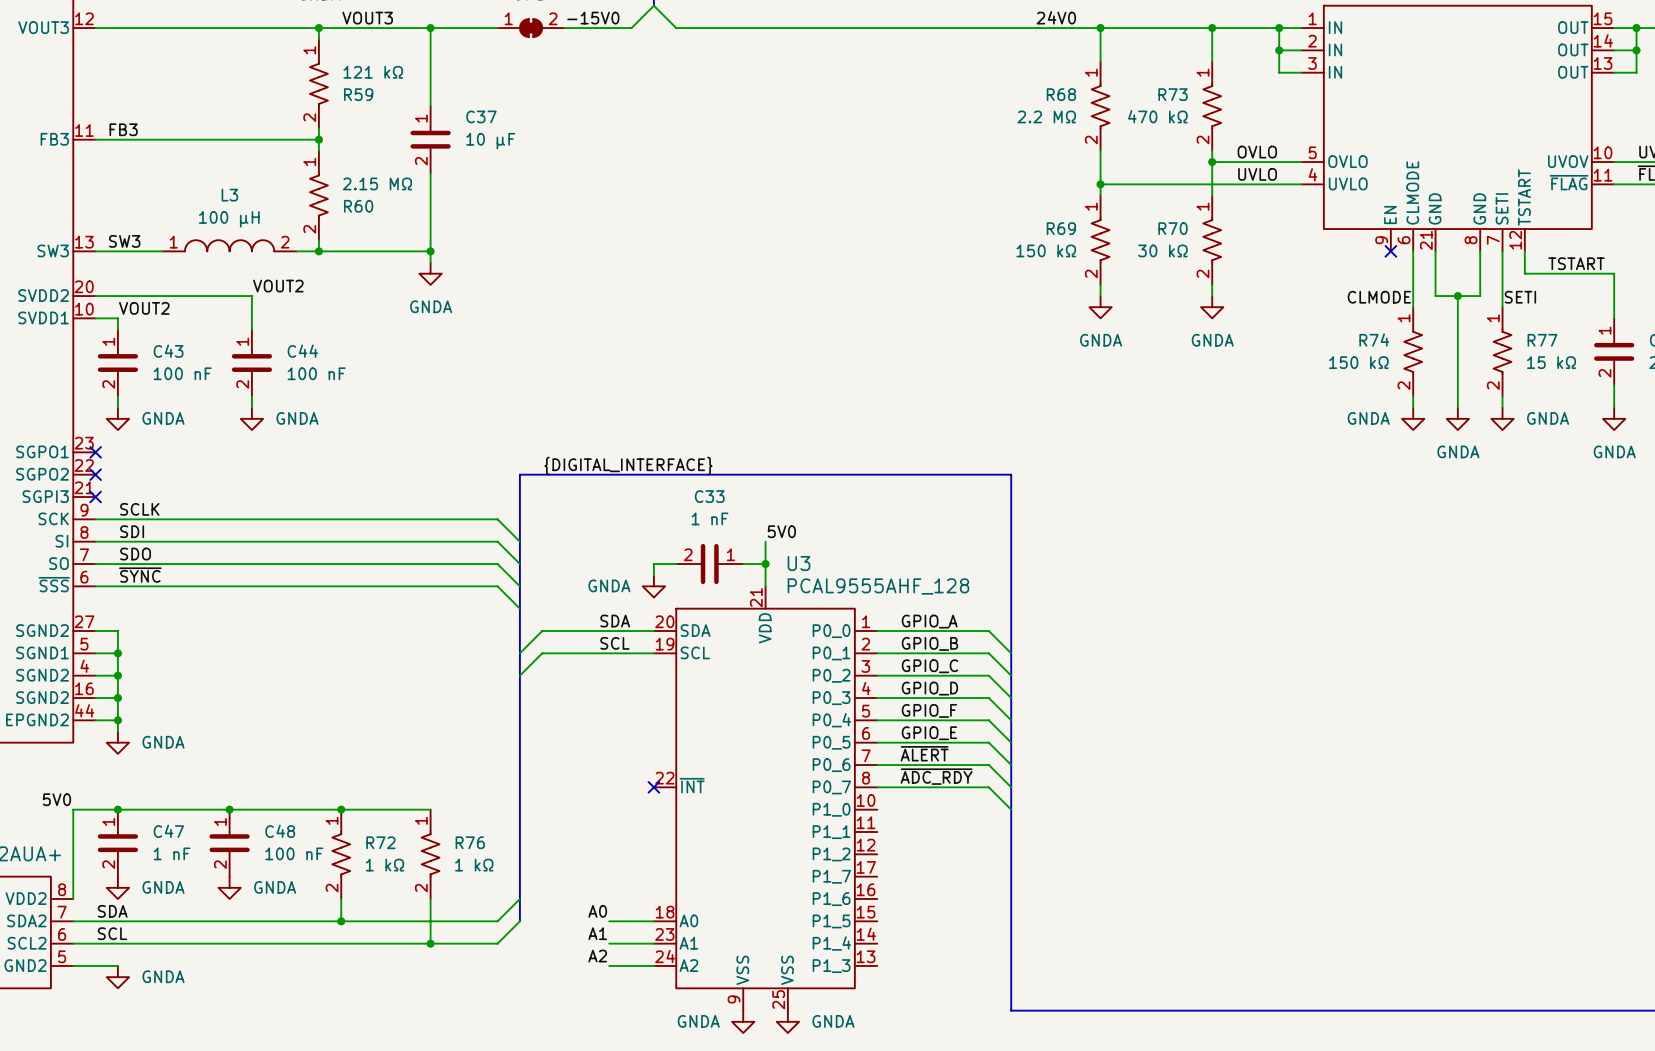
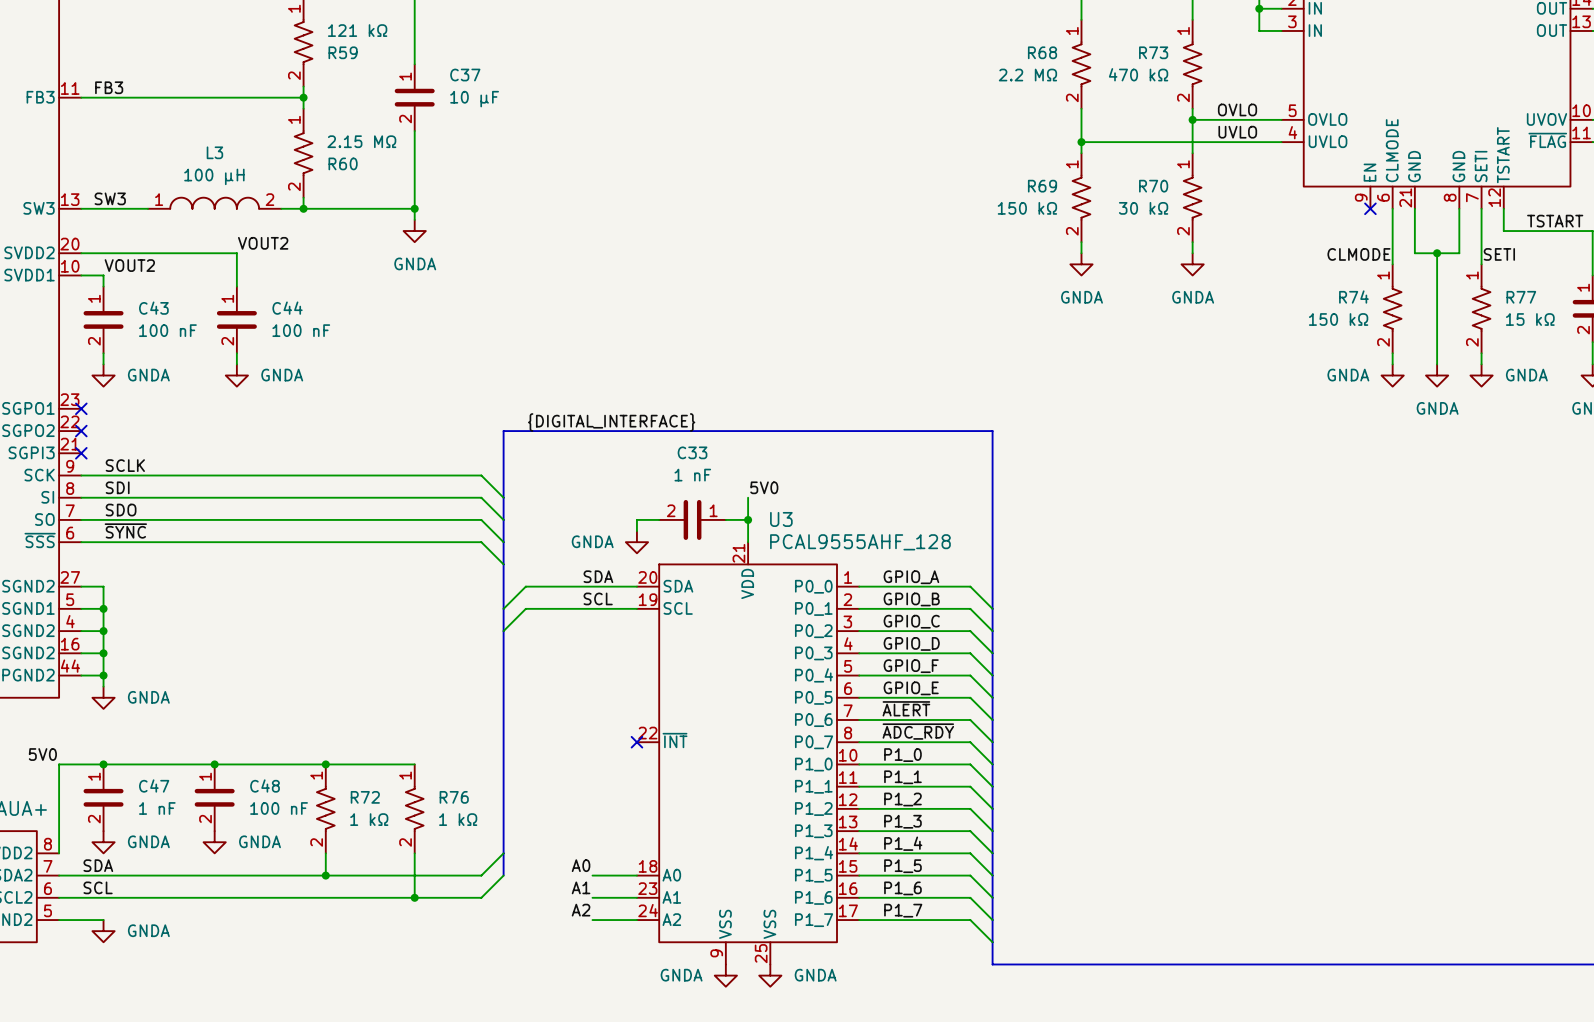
label: none -> P1_0 (902, 755)
wire: none -> (859, 764) (970, 764) (992, 786)
label: none -> P1_1 (902, 777)
wire: none -> (859, 786) (970, 786) (992, 808)
label: none -> P1_2 (902, 799)
wire: none -> (859, 808) (970, 808) (992, 831)
U3 pin number: 17 (866, 867) -> 13 (848, 821)
label: none -> P1_3 (902, 821)
U3 pin name: P1_7 (831, 876) -> P1_3 (813, 831)
wire: none -> (859, 831) (970, 831) (992, 853)
U3 pin number: 16 (866, 889) -> 14 (848, 843)
label: none -> P1_4 (903, 843)
wire: none -> (859, 853) (970, 853) (992, 875)
U3 pin name: P1_6 (831, 899) -> P1_4 (814, 853)
label: none -> P1_5 (902, 866)
wire: none -> (859, 875) (970, 875) (992, 897)
U3 pin number: 14 (866, 934) -> 16 (848, 888)
label: none -> P1_6 (902, 888)
U3 pin name: P1_4 (831, 943) -> P1_6 (813, 897)
wire: none -> (859, 897) (970, 897) (992, 920)
U3 pin number: 13 (866, 956) -> 17 (848, 910)
label: none -> P1_7 (903, 910)
wire: none -> (859, 920) (970, 920) (992, 942)
U3 pin name: P1_3 (831, 966) -> P1_7 (814, 920)

